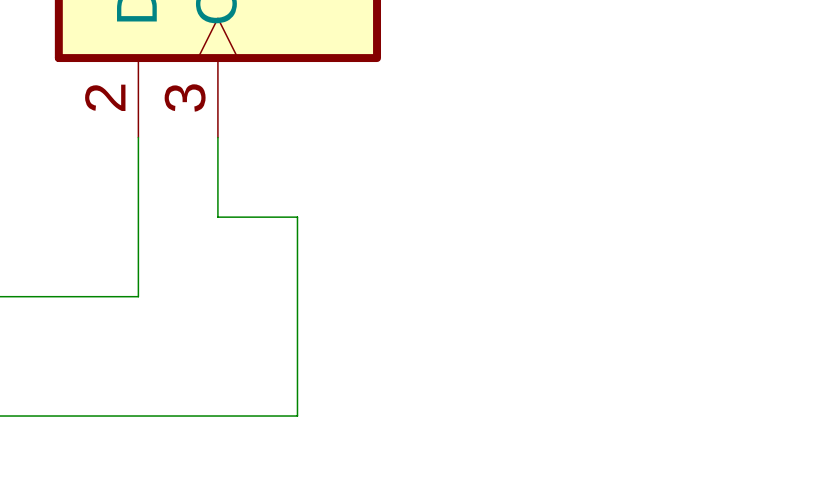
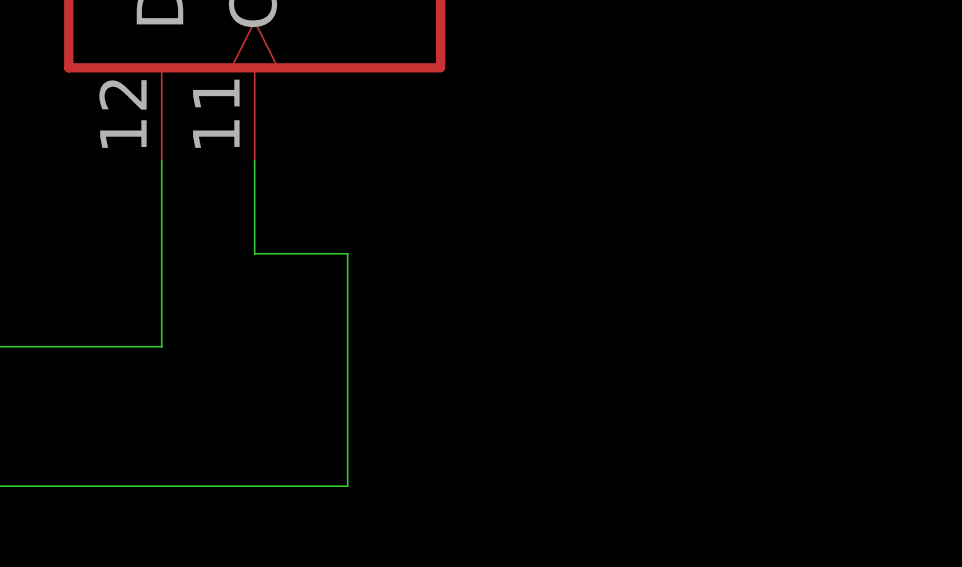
part pin number: 2 (105, 97) -> 12 (122, 114)
part pin number: 3 (185, 97) -> 11 (216, 113)

